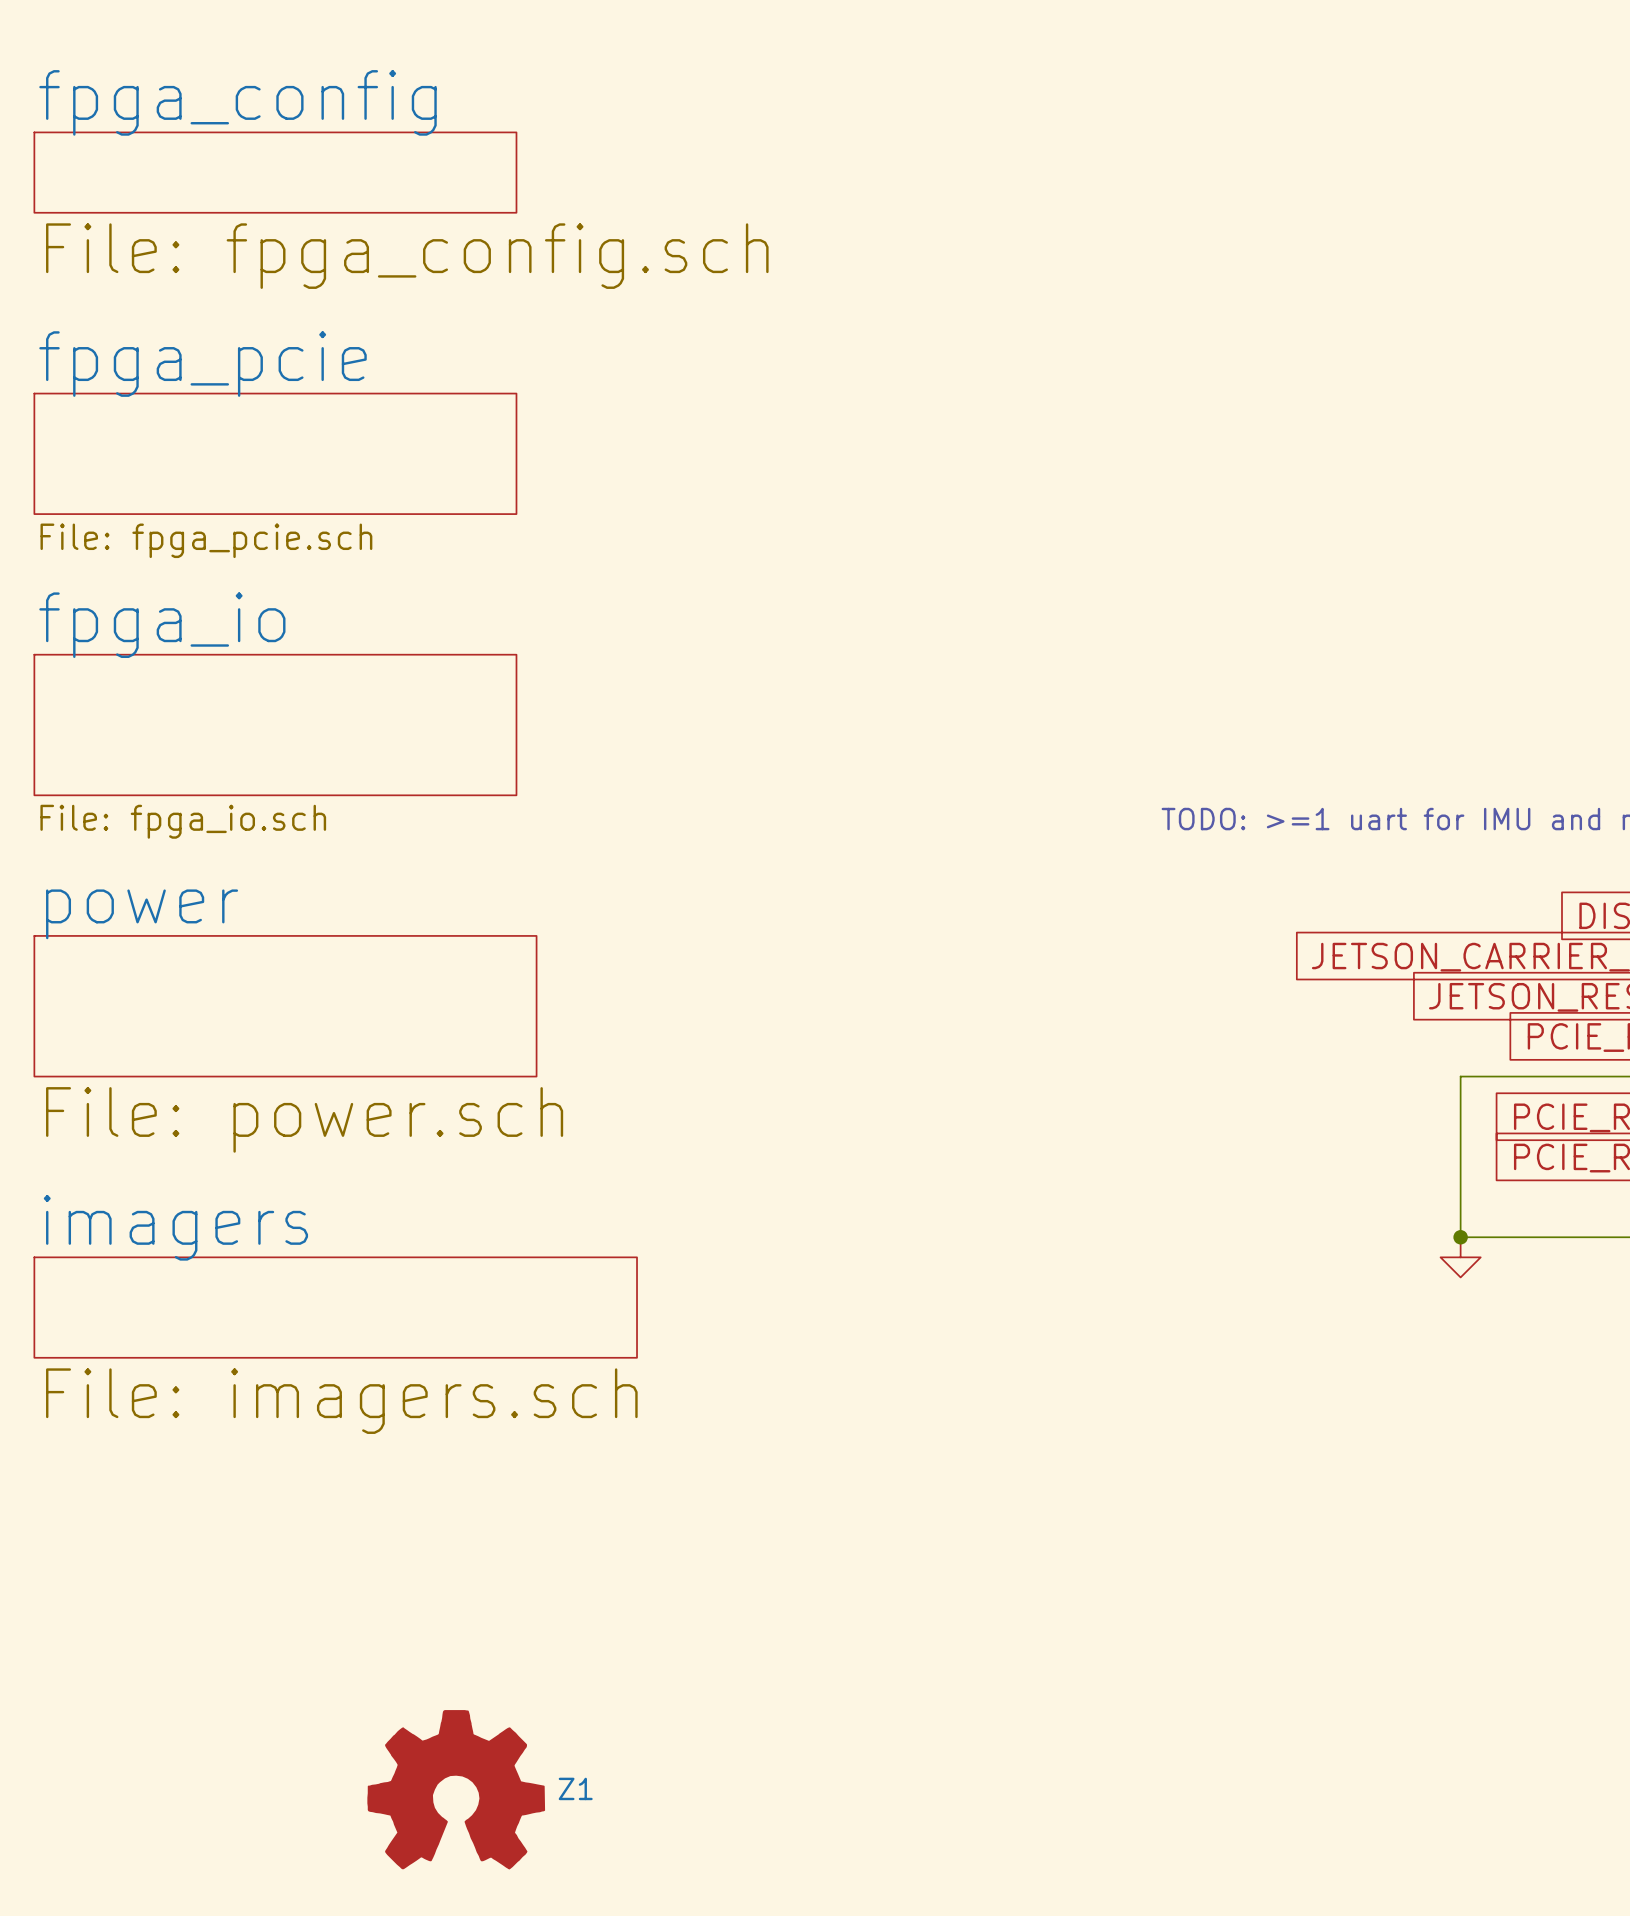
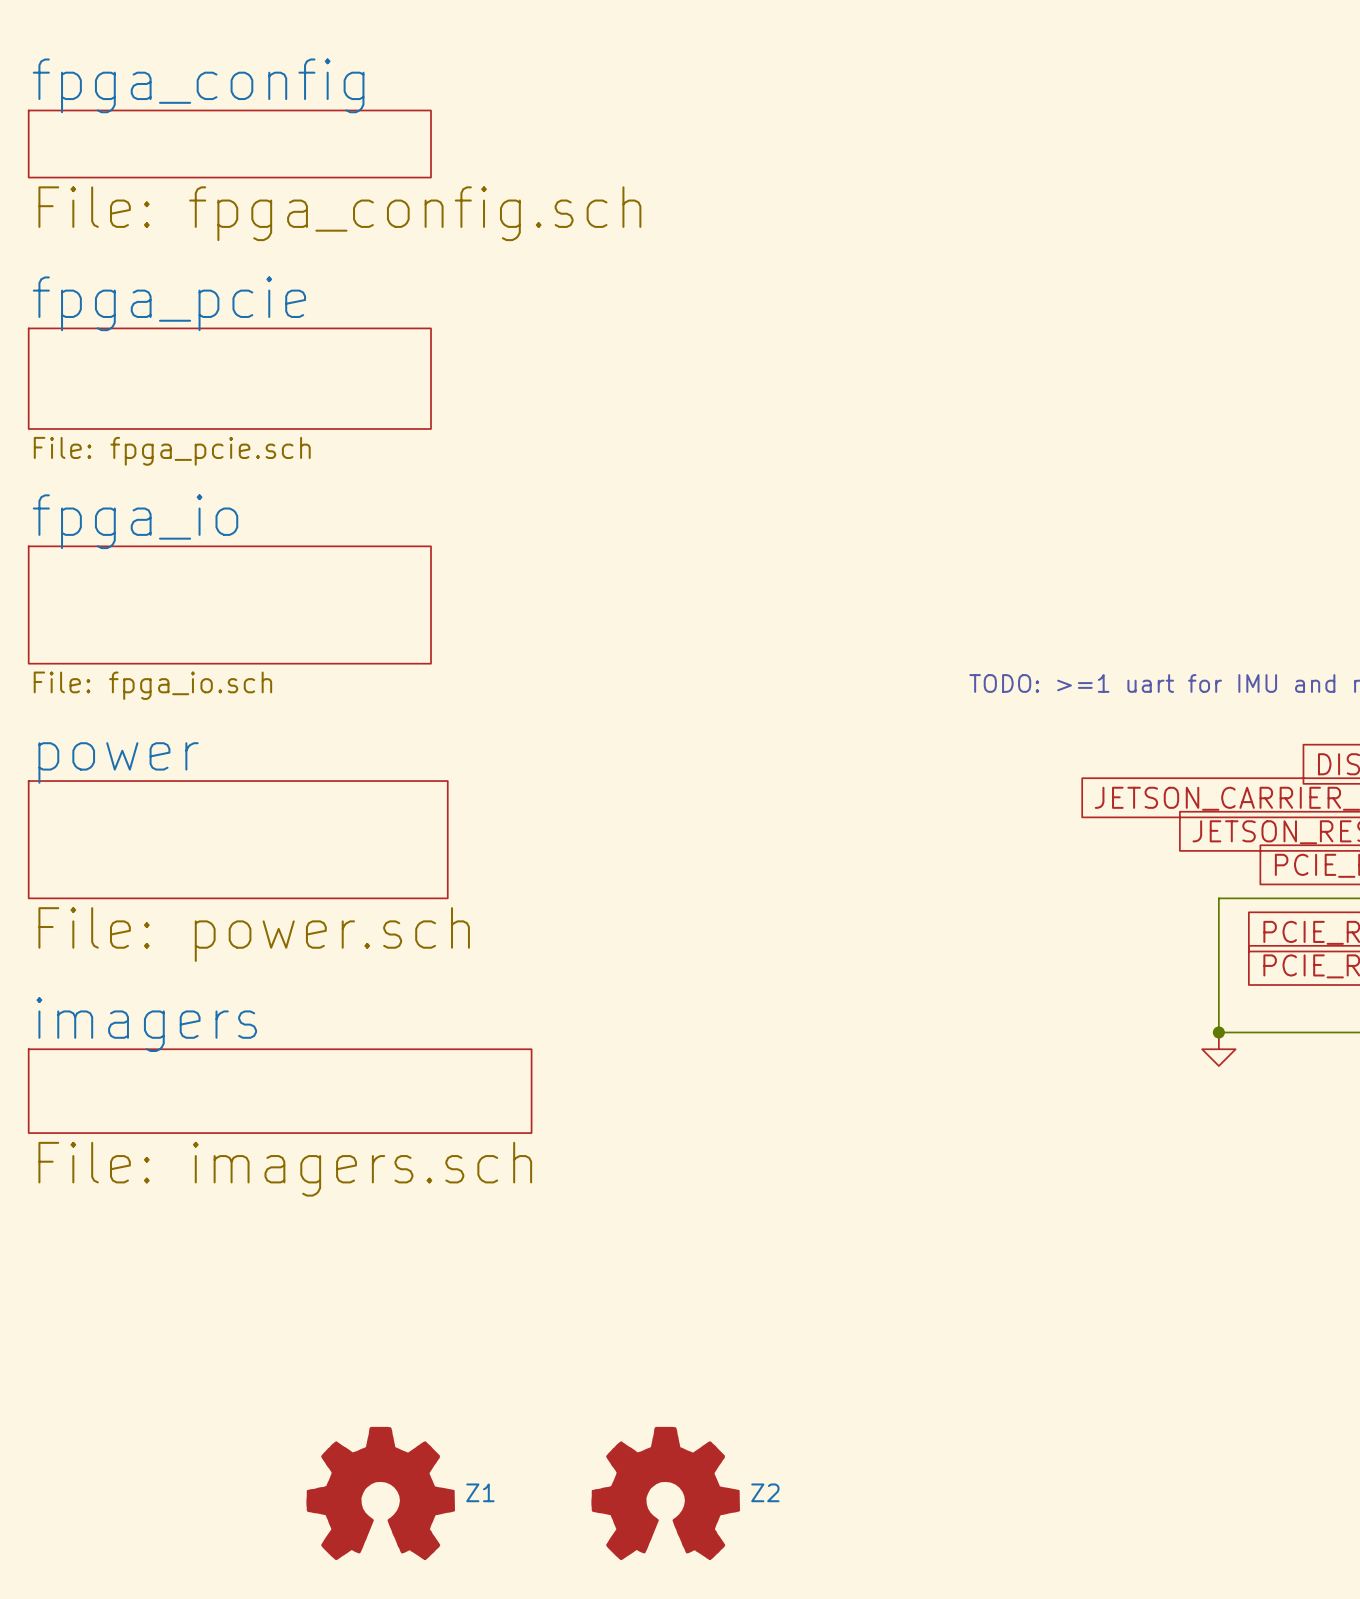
Z2: none -> (665, 1493)

